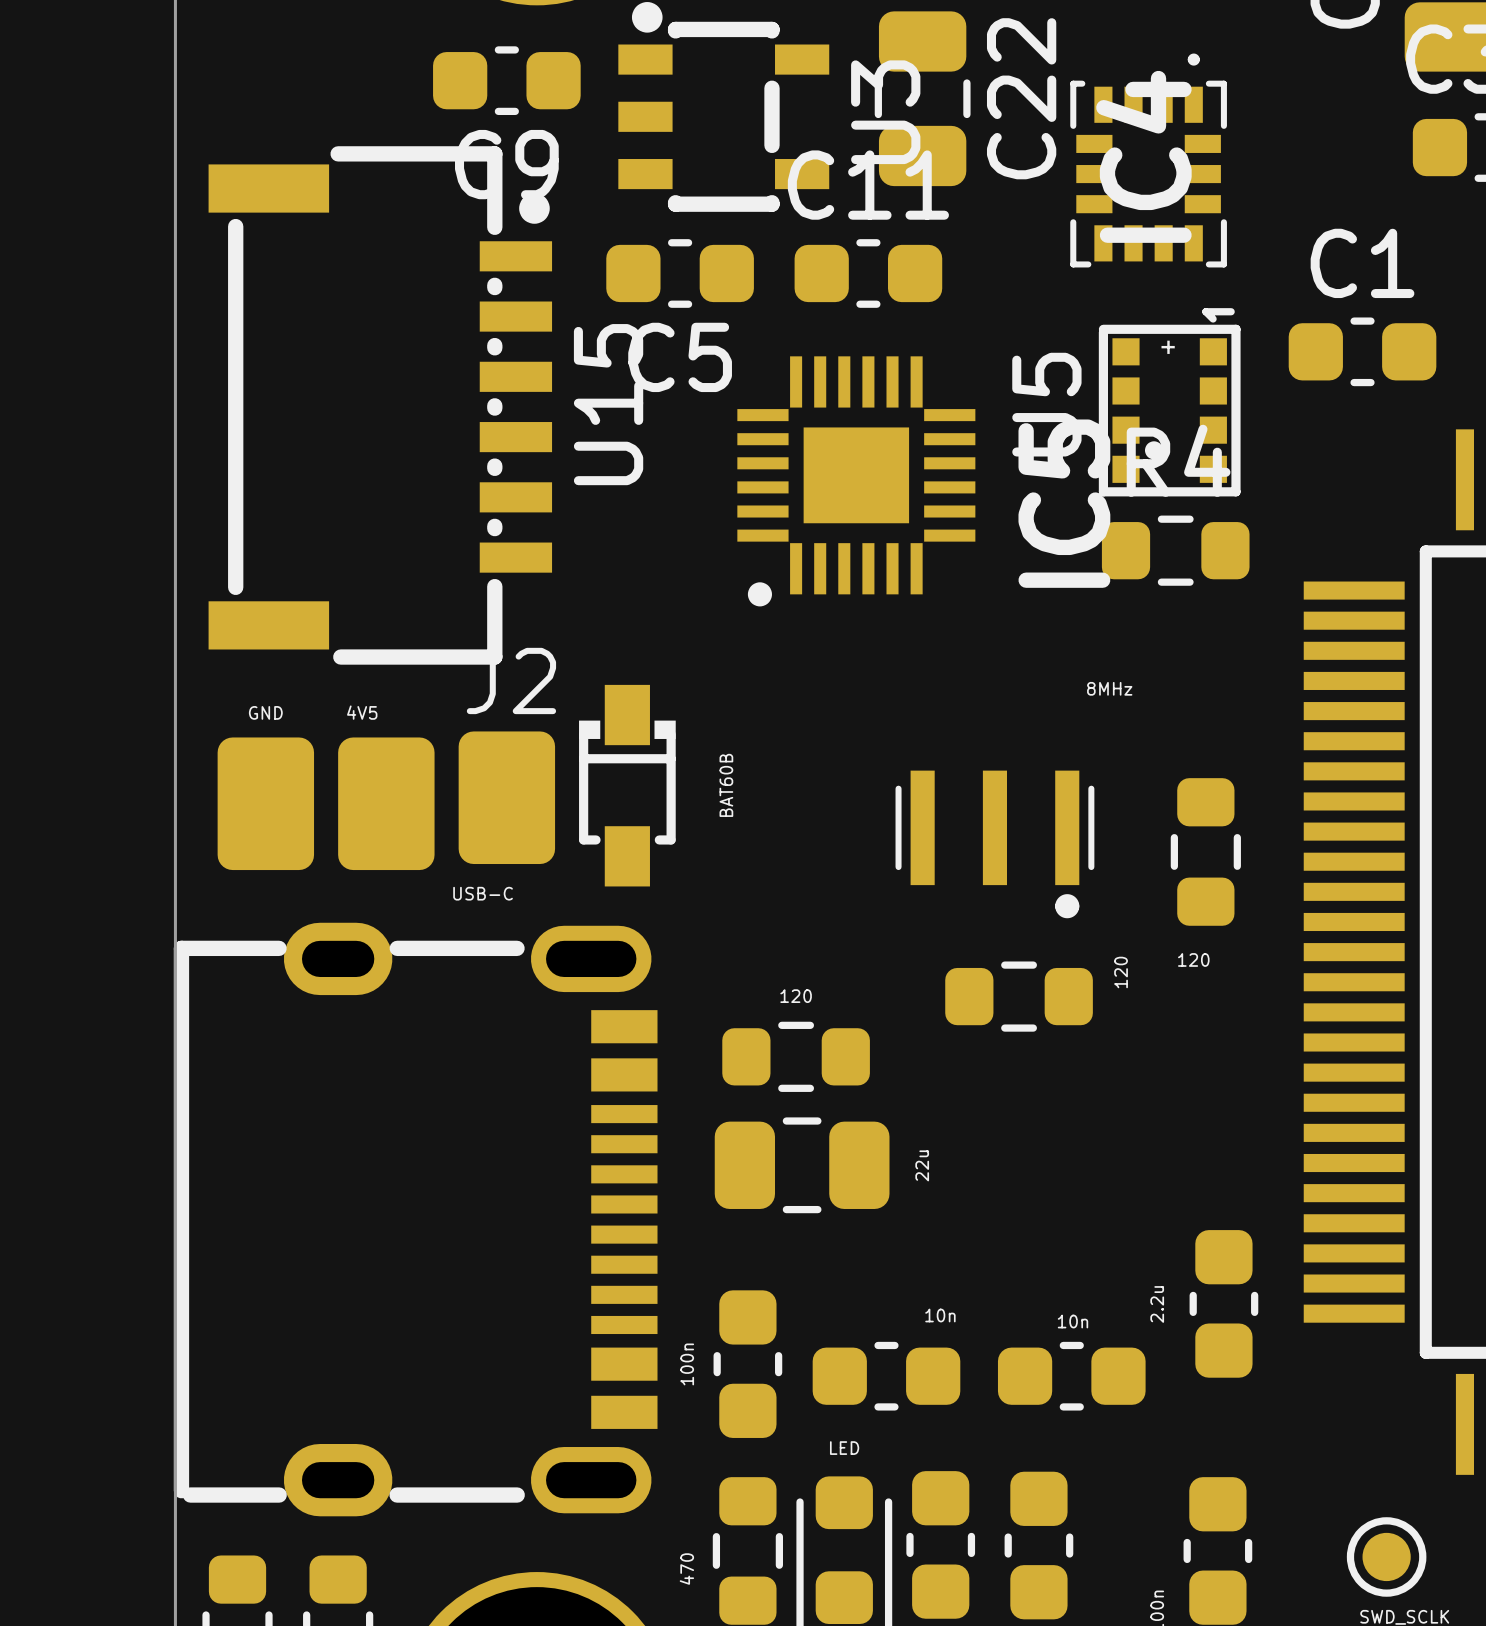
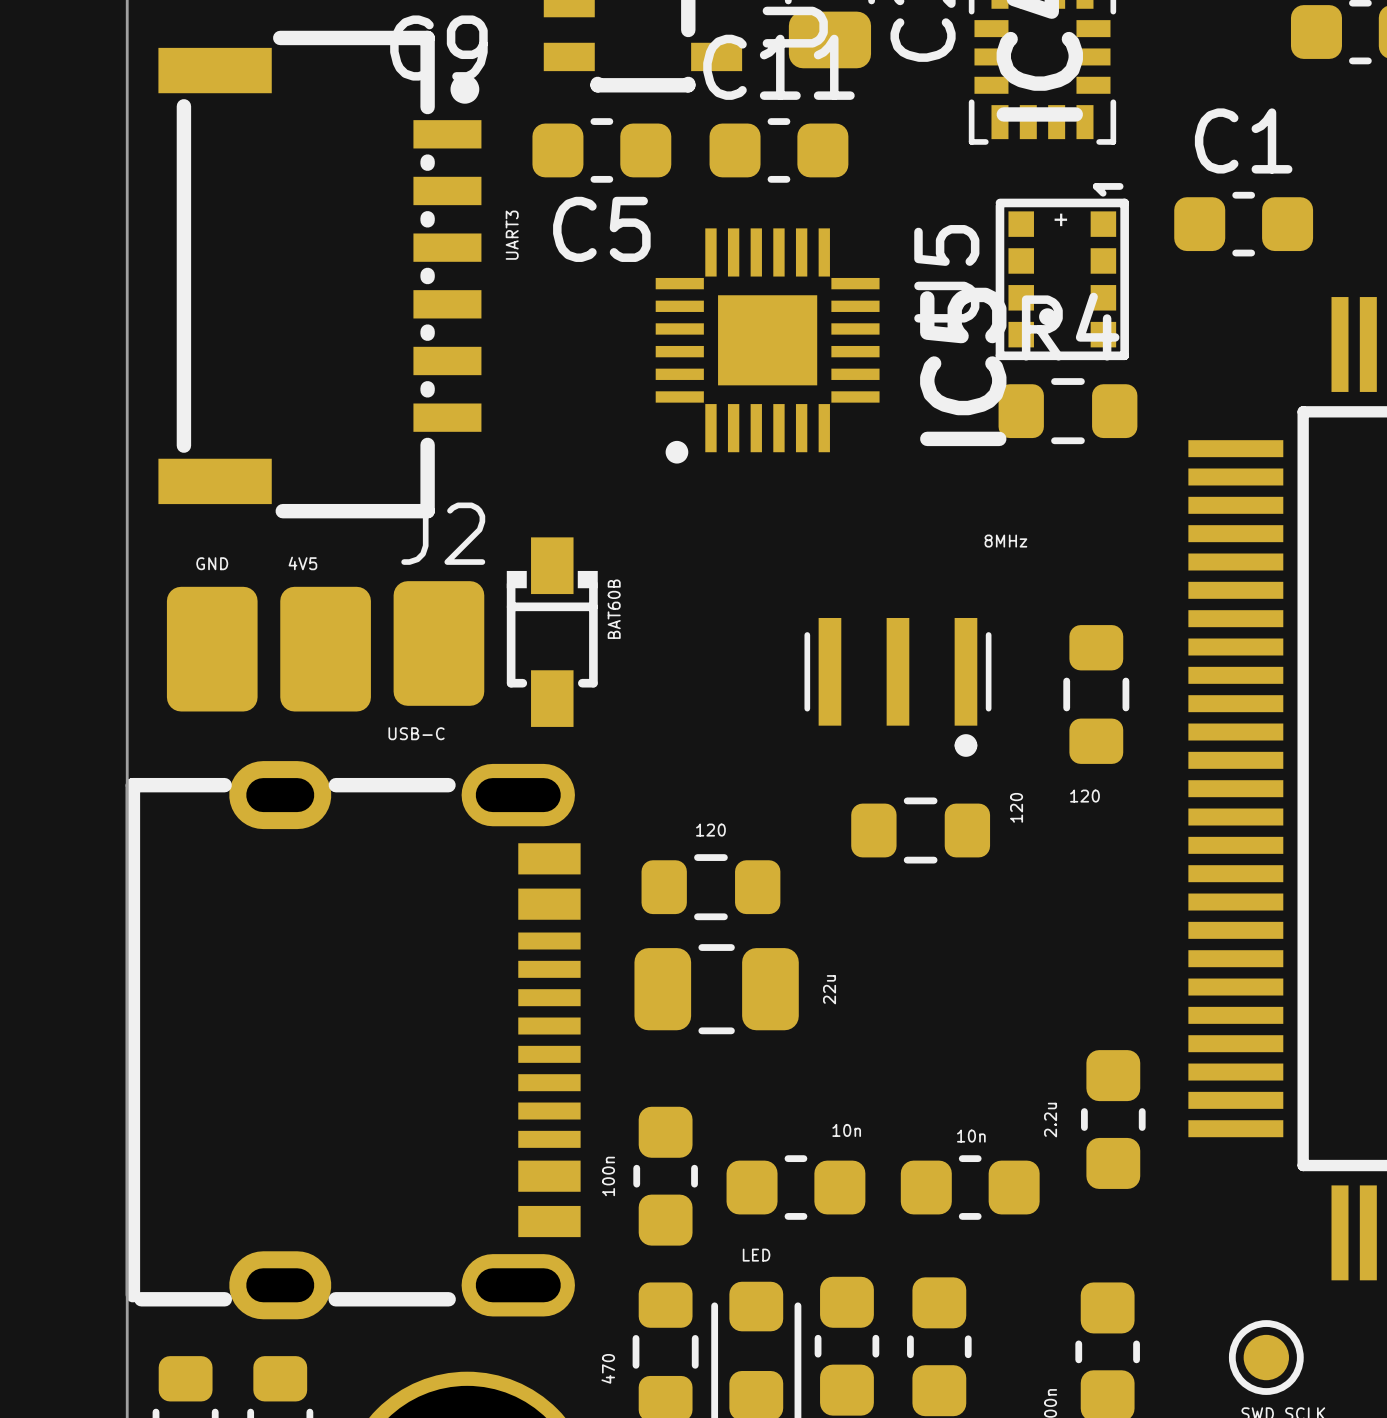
U15 name: U15 (608, 404) -> UART3 (512, 235)
BAT60B name position: BAT60B (726, 785) -> BAT60B (614, 609)

